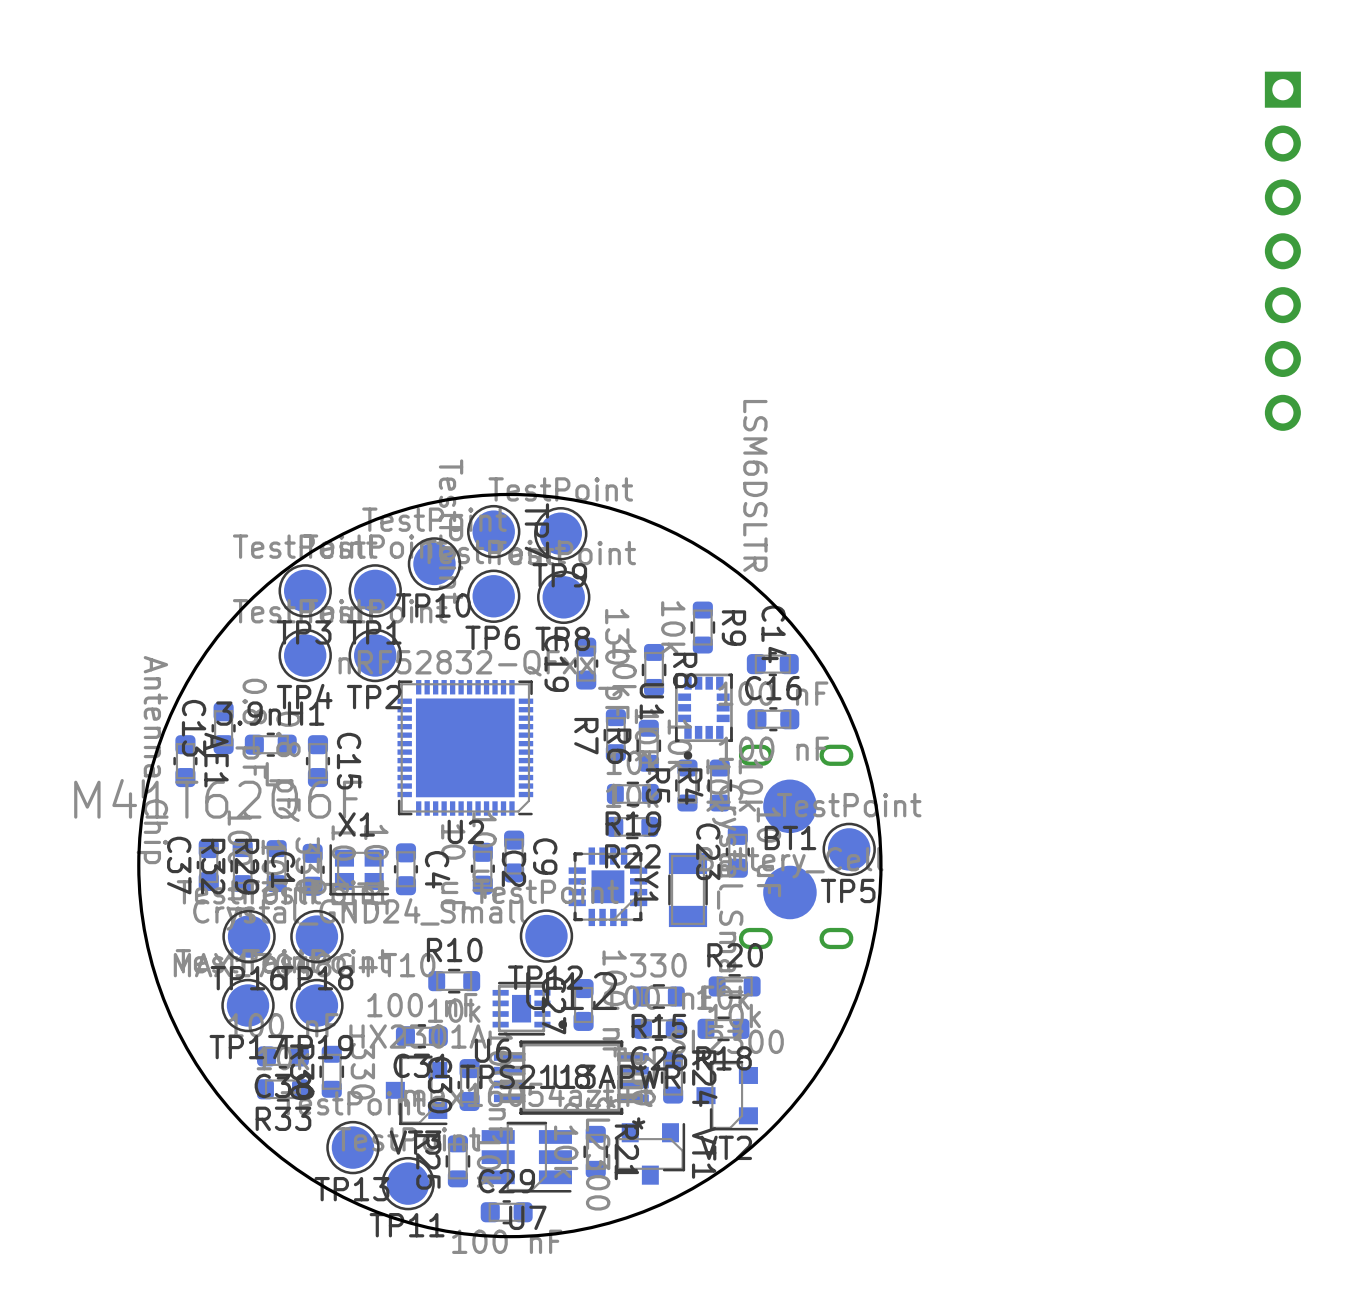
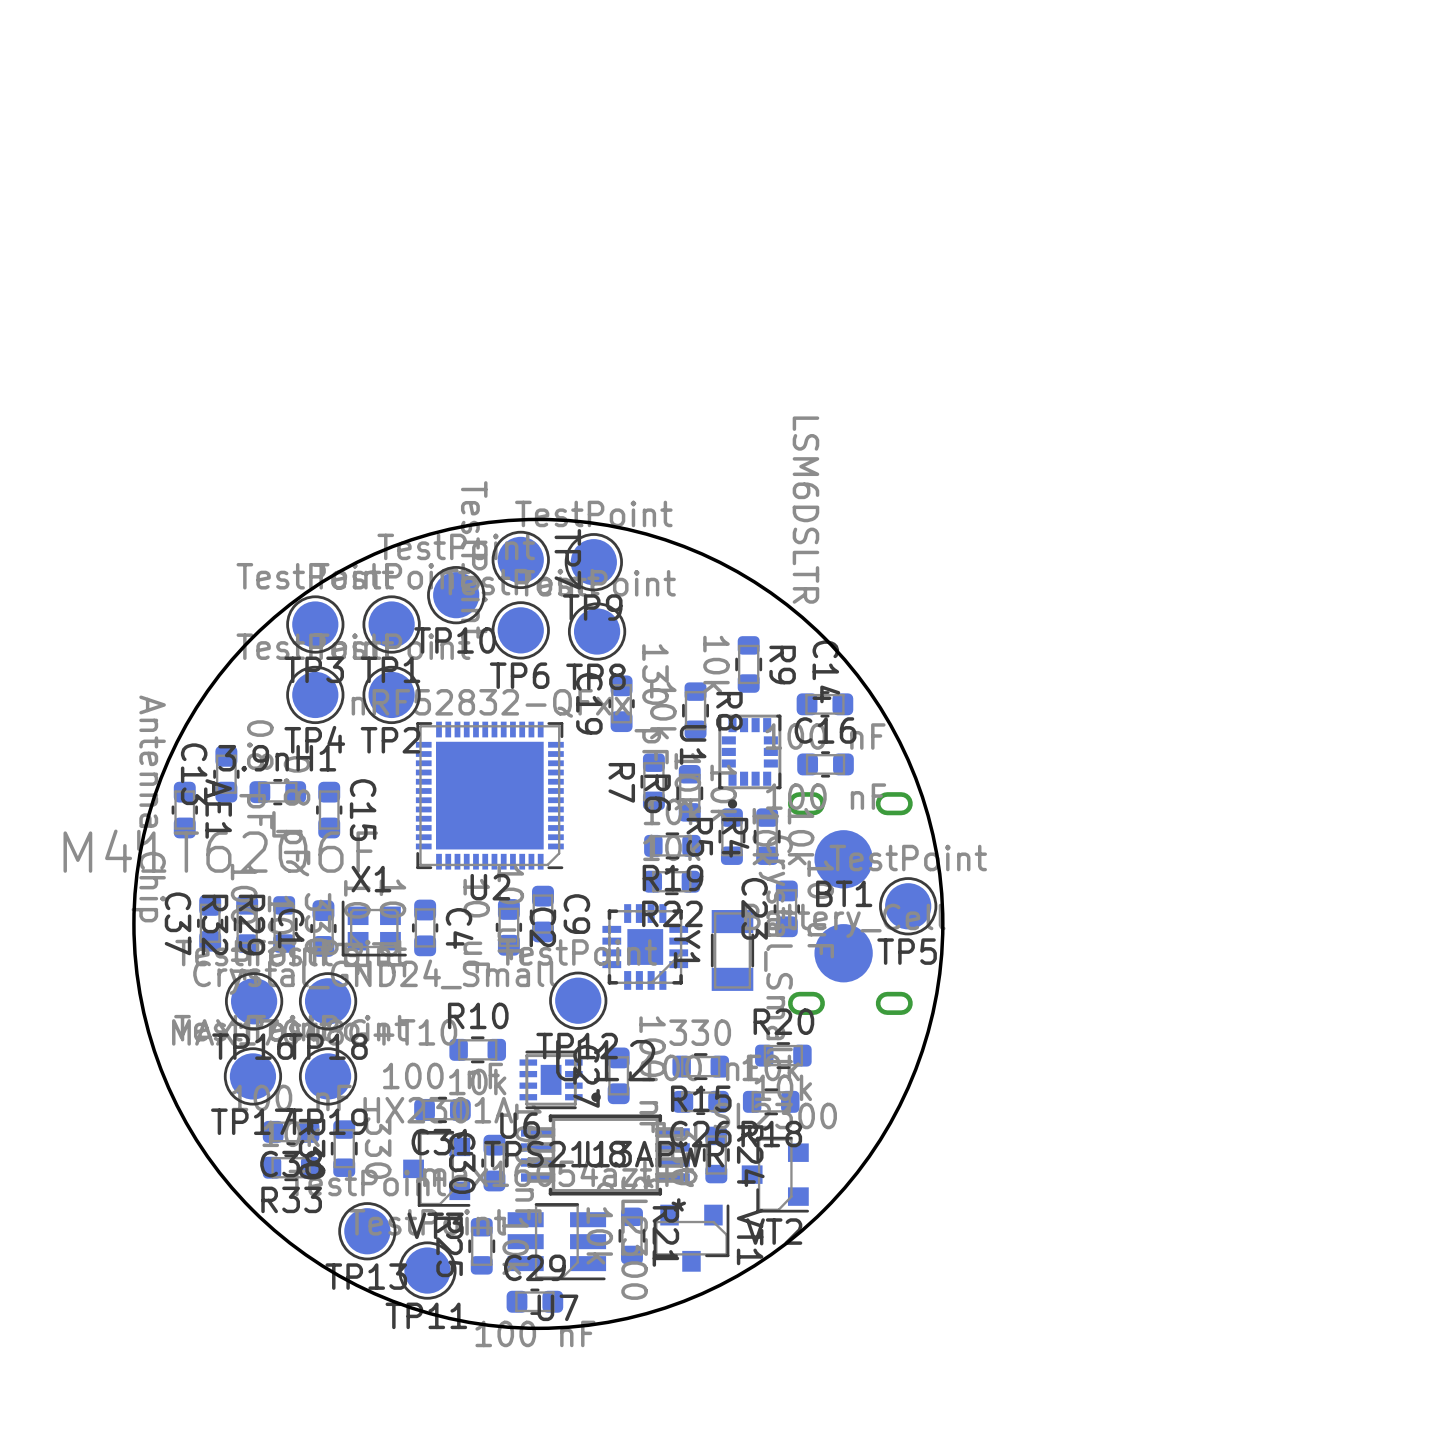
part: (1282, 251) -> none

